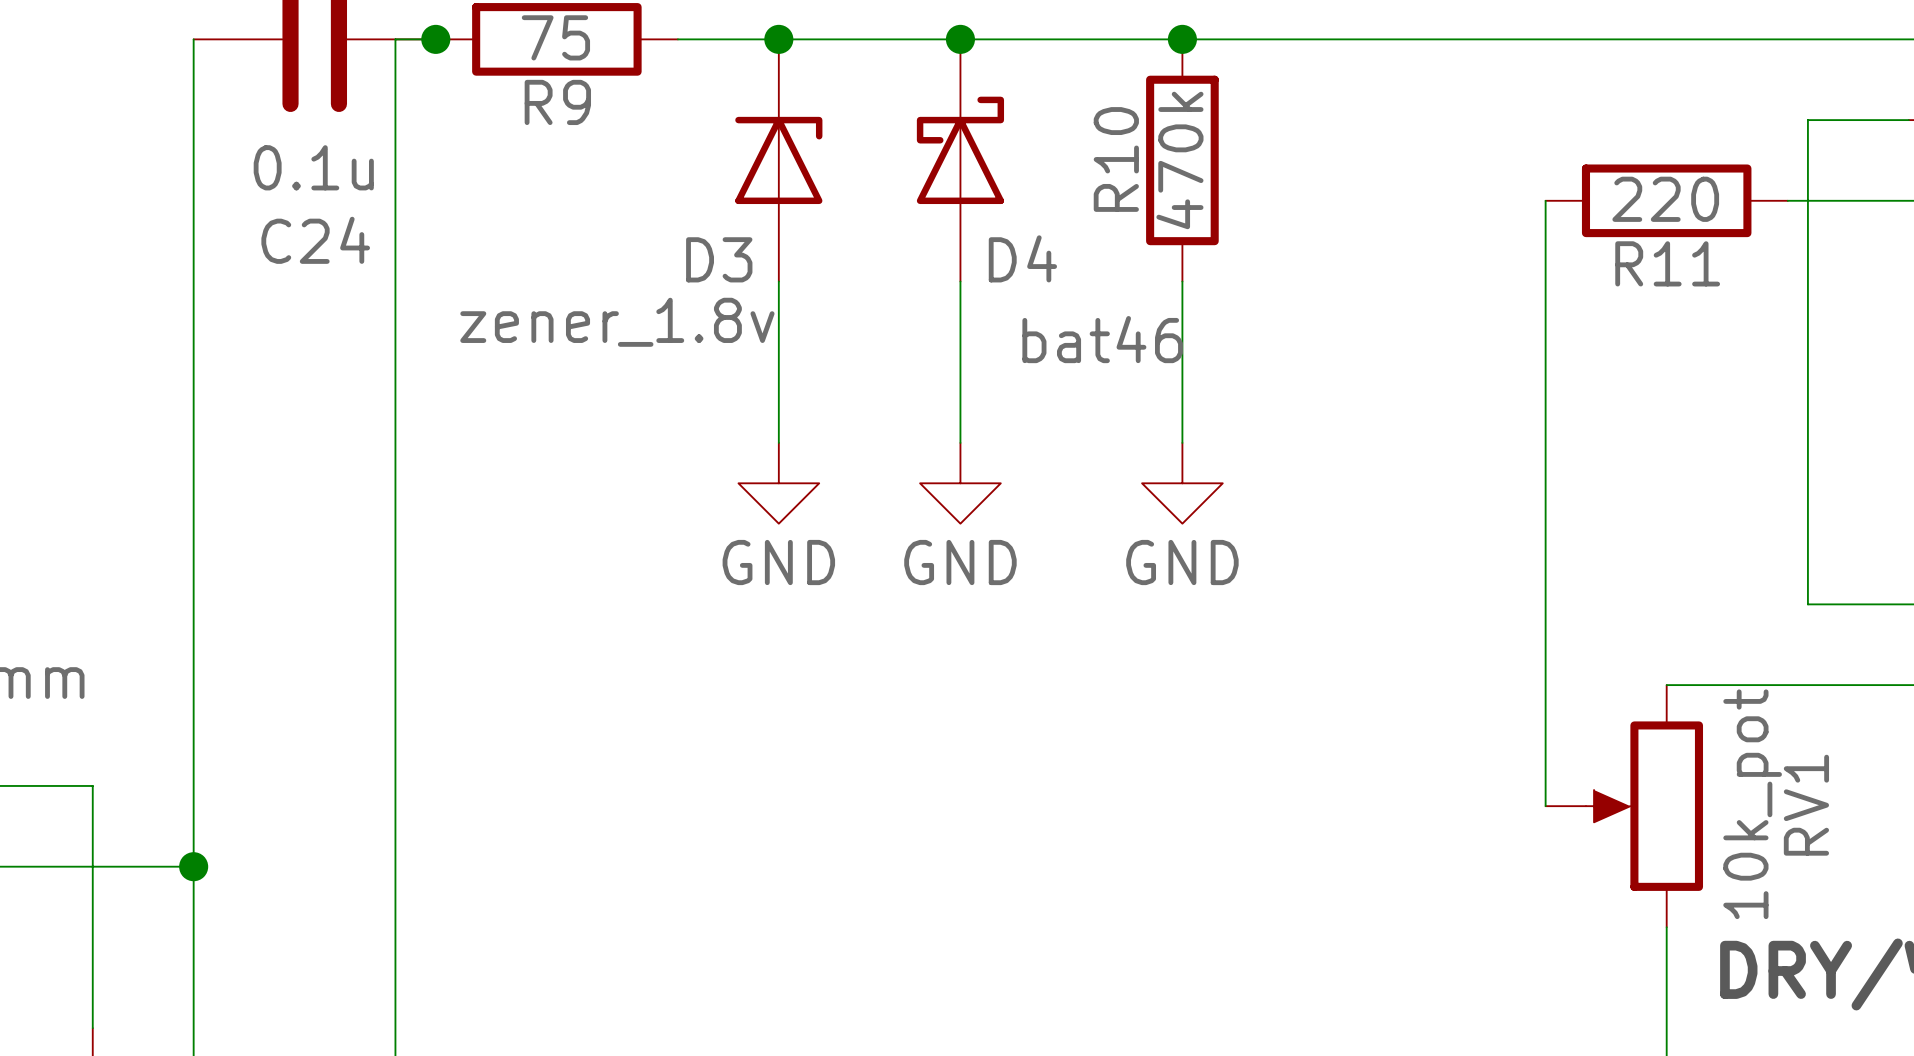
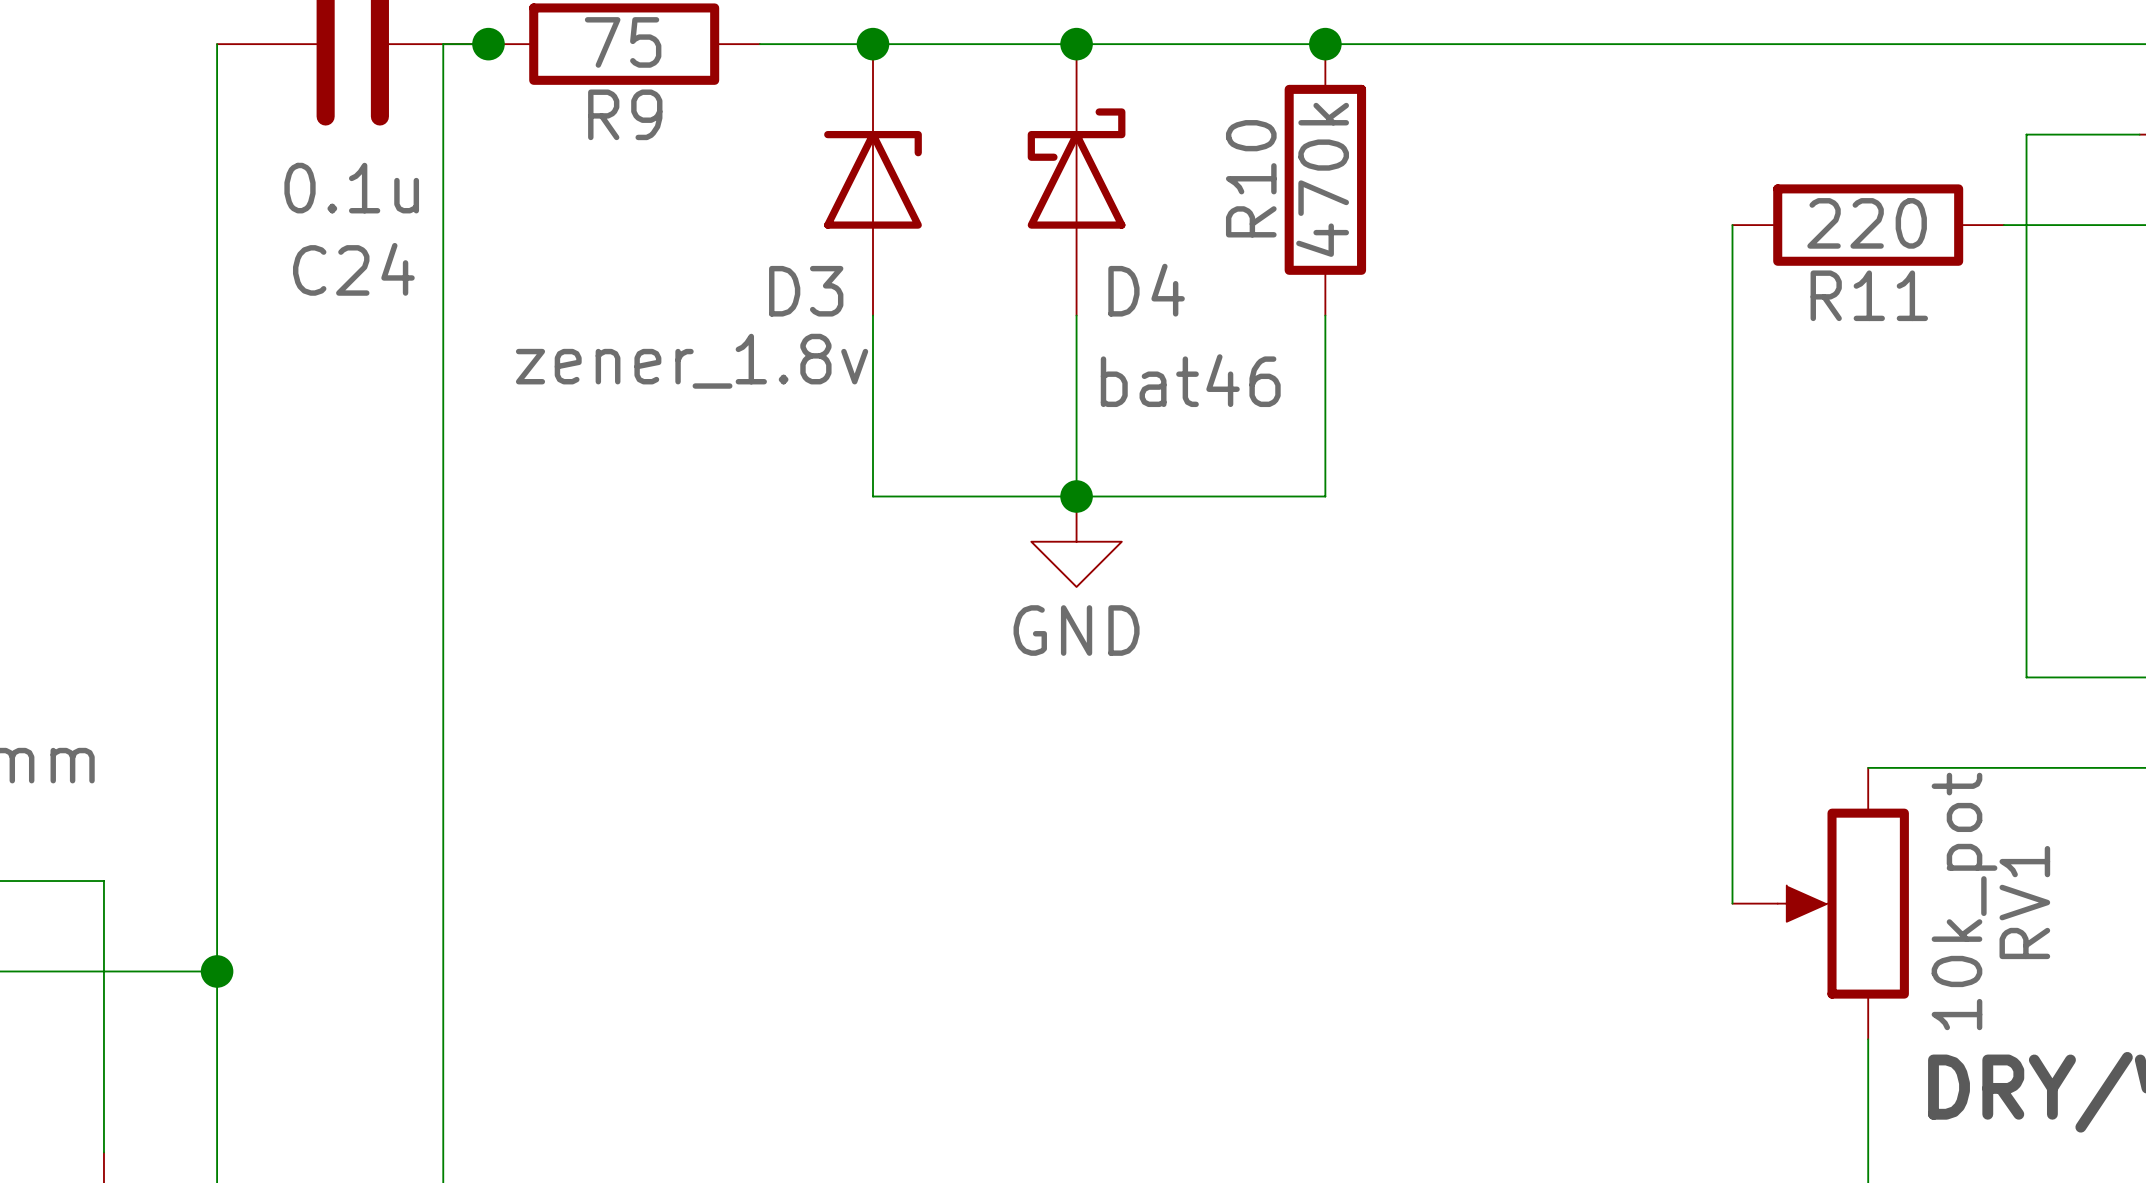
D4 value position: bat46 (1102, 339) -> bat46 (1190, 380)
wire: none -> (873, 496) (1325, 496)
junction: none -> (1076, 496)
power symbol: GND (778, 483) -> none
power symbol: GND (1182, 483) -> none

